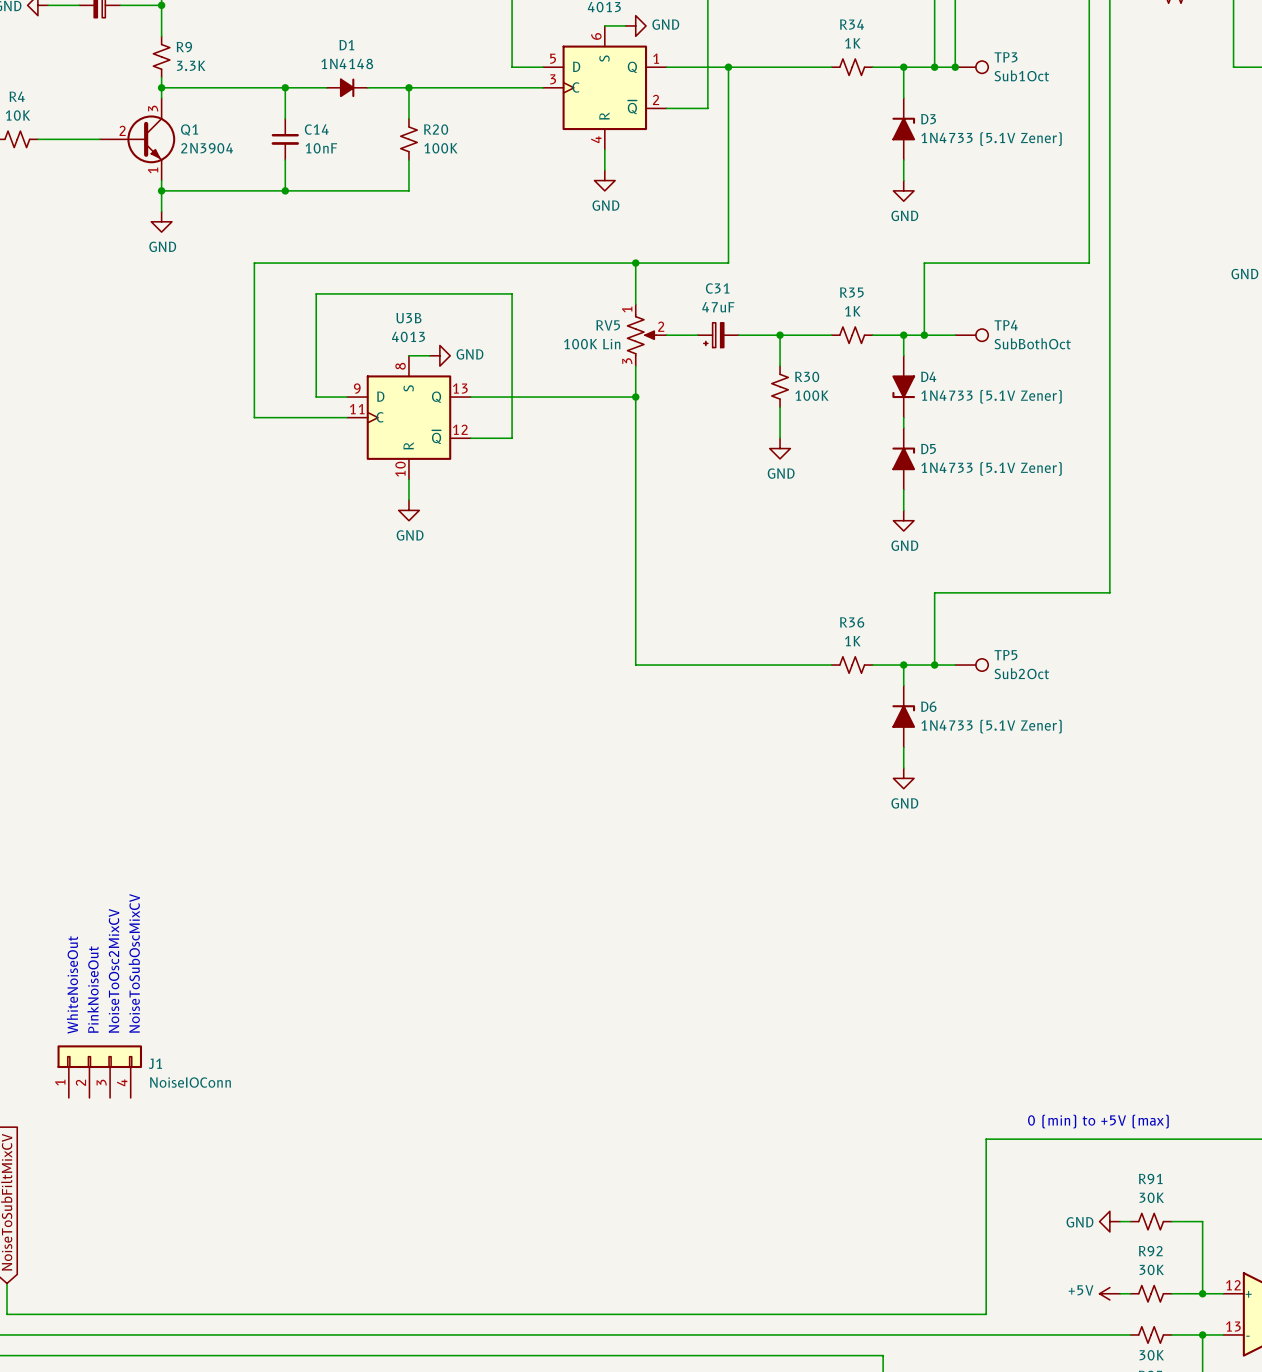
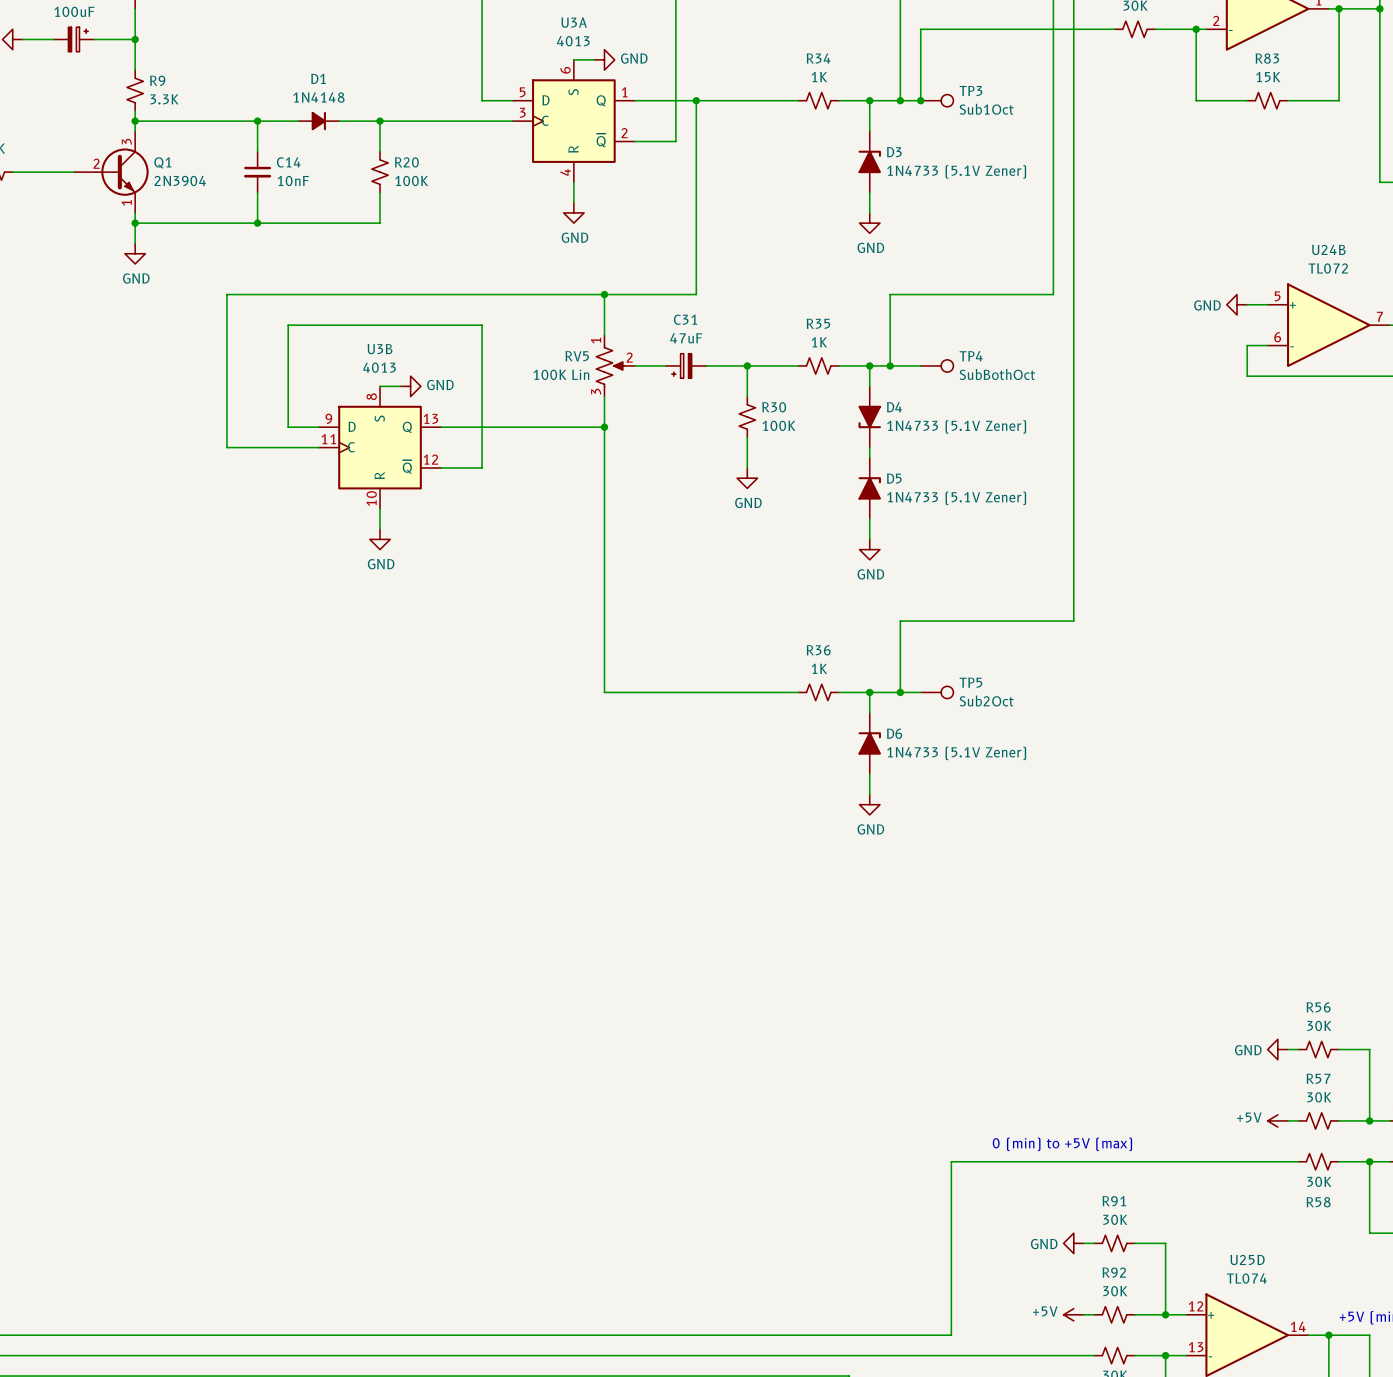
text: NoiseToSubOscMixCV (134, 963) -> none
text: NoiseToOsc2MixCV (114, 970) -> none
text: WhiteNoiseOut (72, 984) -> none
text: PinkNoiseOut (93, 989) -> none
J1: NoiseIOConn (99, 1071) -> none

